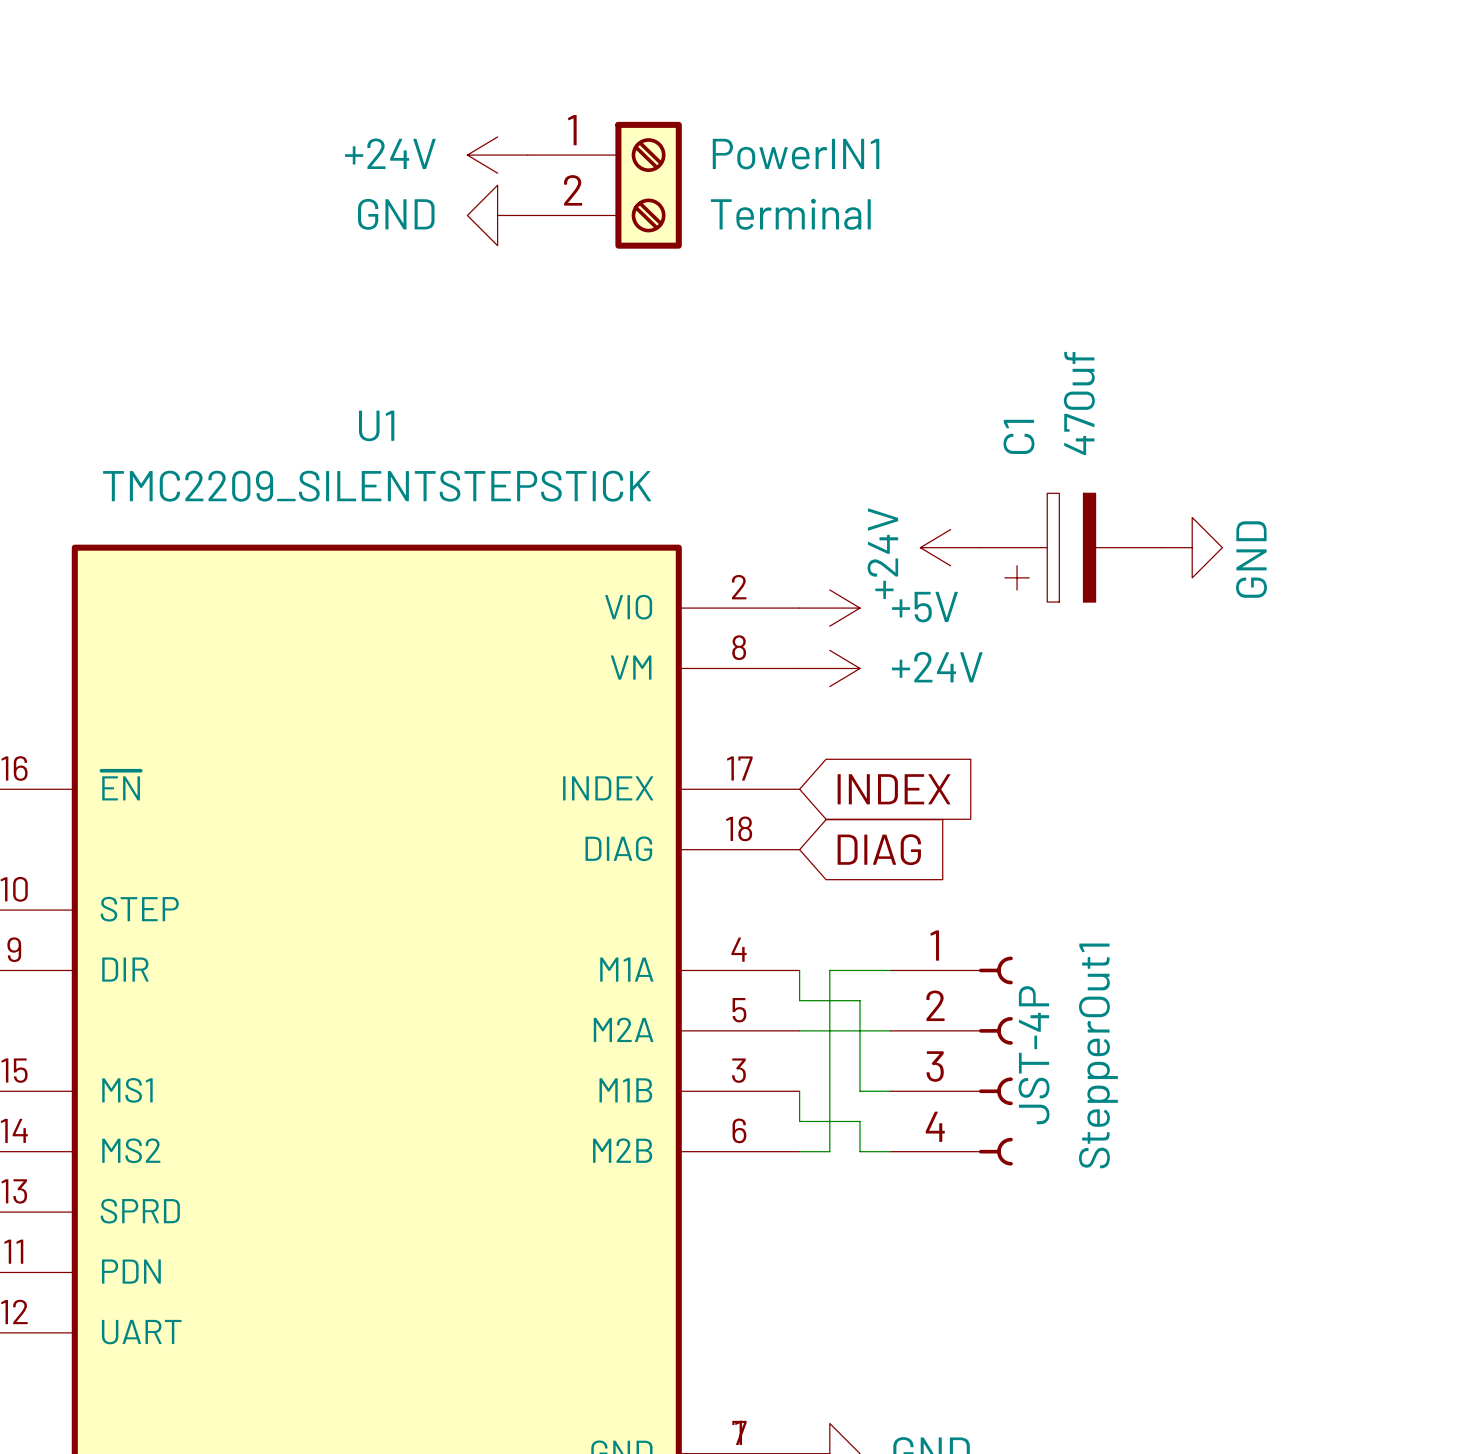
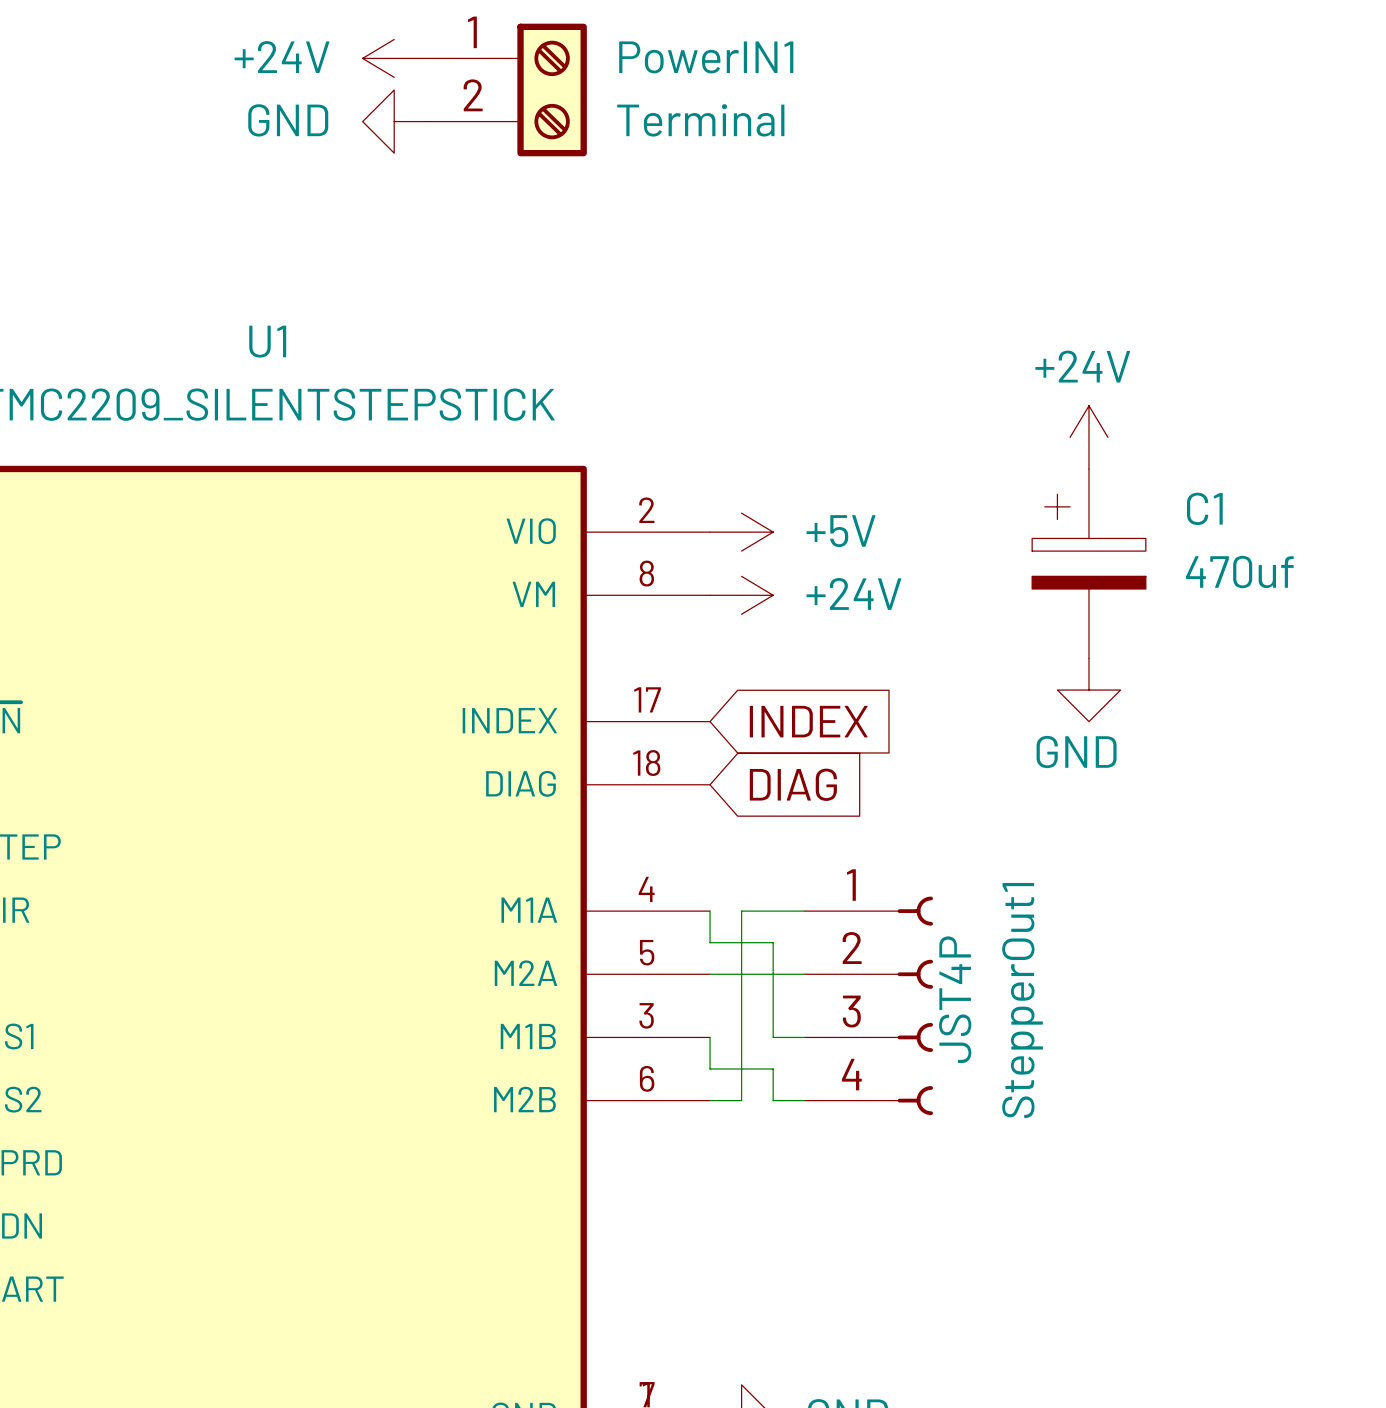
power symbol rotation: 0° (950, 547) -> 90° clockwise (1088, 437)
power symbol position: +24V (950, 547) -> +24V (1088, 437)
C1 rotation: 0° (1050, 547) -> 90° clockwise (1088, 541)
C1 position: (1071, 547) -> (1088, 563)
power symbol rotation: 0° (1192, 547) -> 90° clockwise (1088, 690)
power symbol position: GND (1192, 547) -> GND (1088, 690)
StepperOut1 value: JST-4P (1034, 1055) -> JST4P (955, 999)

